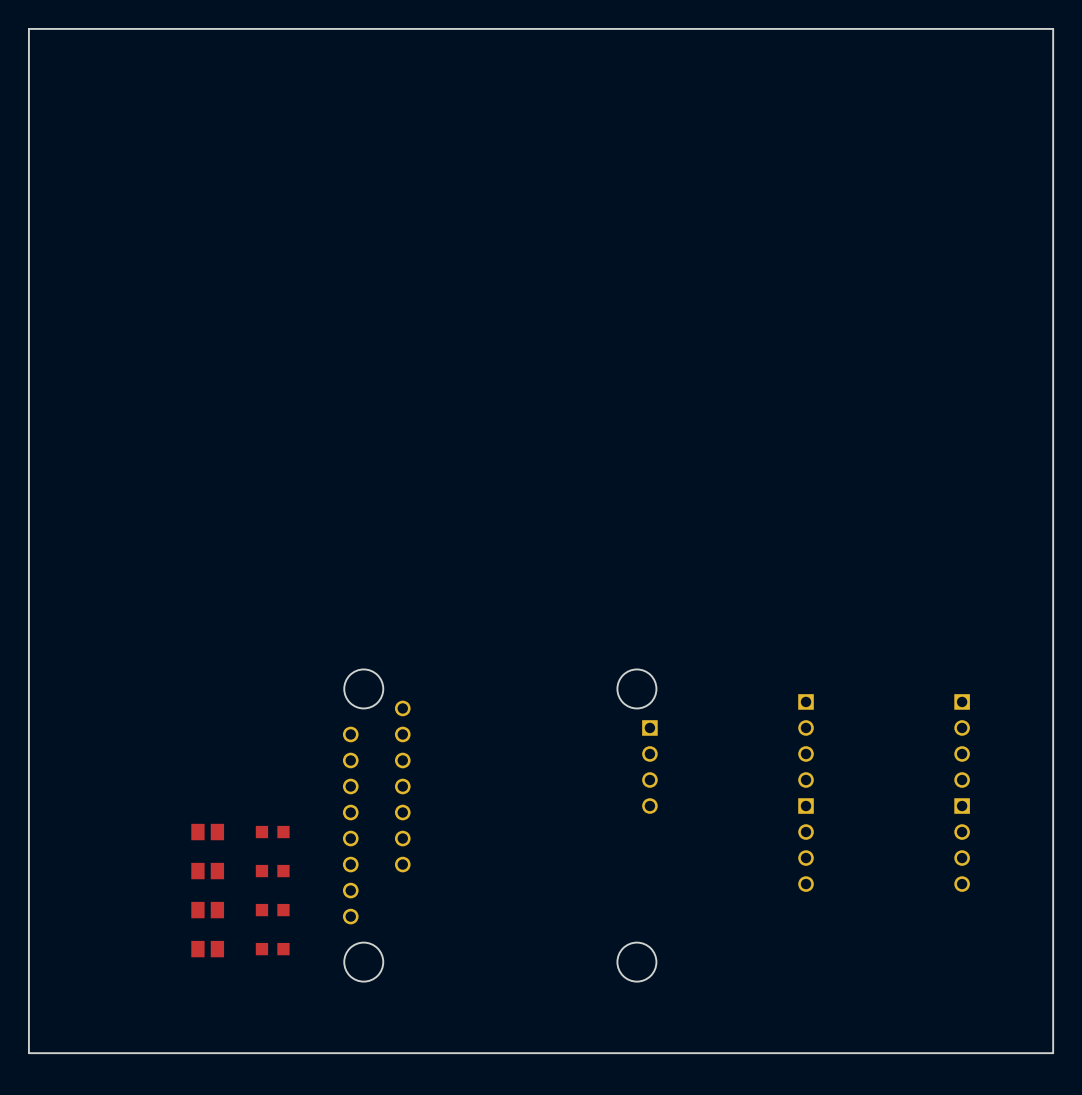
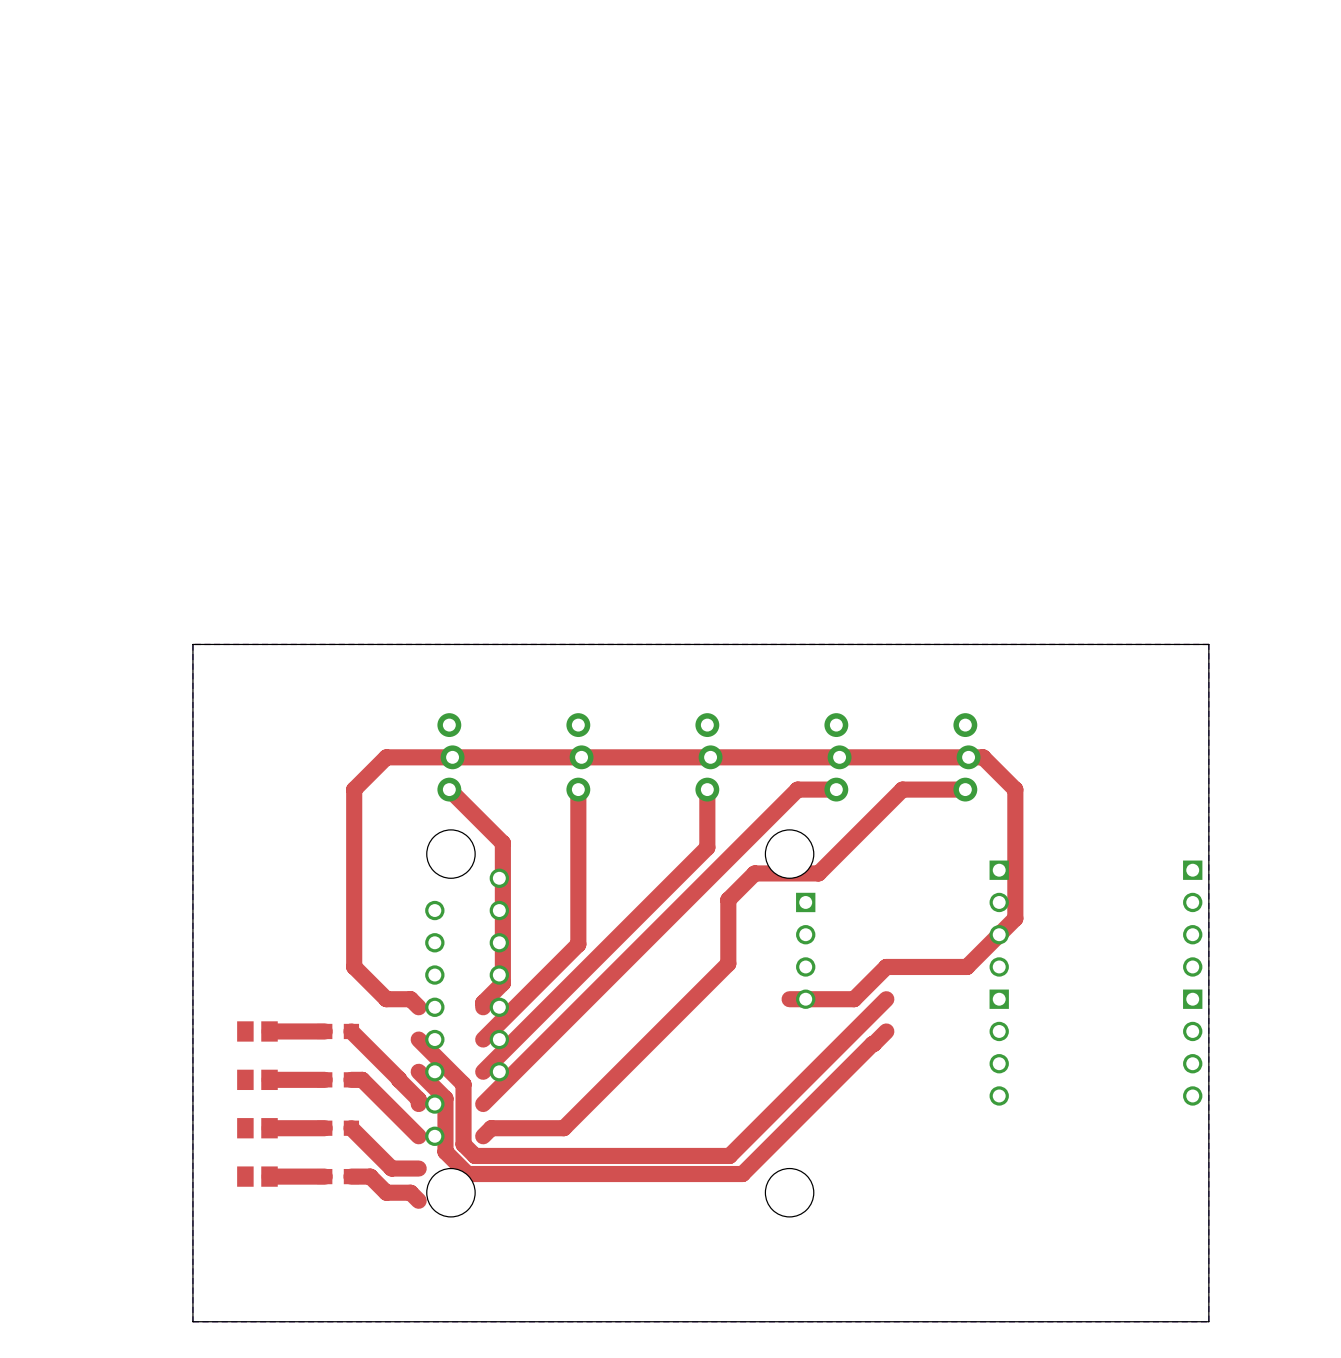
board edge: (1053, 28) (28, 28) (28, 1053) (1053, 1053) (1053, 28) -> none
board edge: none -> (1208, 644) (192, 644) (192, 1321) (1208, 1321) (1208, 644)
part: none -> (450, 757)
part: none -> (579, 757)
part: none -> (708, 757)
part: none -> (837, 757)
part: none -> (966, 757)
top track: none -> (449, 789) (502, 843) (502, 983) (483, 1002) (483, 1007)
top track: none -> (578, 789) (578, 944) (483, 1039)
top track: none -> (707, 789) (707, 847) (483, 1071)
top track: none -> (836, 789) (797, 789) (483, 1104)
top track: none -> (965, 789) (902, 789) (818, 873) (754, 873) (728, 899) (728, 963) (563, 1128) (491, 1128) (483, 1136)
top track: none -> (789, 999) (854, 999) (886, 966) (966, 966) (1015, 918) (1015, 789) (983, 757) (386, 757) (354, 789) (354, 966) (386, 999) (410, 999) (418, 1007)
top track: none -> (886, 999) (729, 1155) (475, 1155) (463, 1144) (463, 1084) (418, 1039)
top track: none -> (324, 1031) (269, 1031)
top track: none -> (351, 1031) (418, 1099) (418, 1104)
top track: none -> (886, 1031) (742, 1174) (467, 1174) (445, 1151) (445, 1098) (418, 1071)
top track: none -> (324, 1079) (269, 1079)
top track: none -> (351, 1079) (362, 1079) (418, 1136)
top track: none -> (324, 1128) (269, 1128)
top track: none -> (351, 1128) (391, 1168) (418, 1168)
top track: none -> (324, 1176) (269, 1176)
top track: none -> (351, 1176) (370, 1176) (386, 1192) (410, 1192) (418, 1200)

